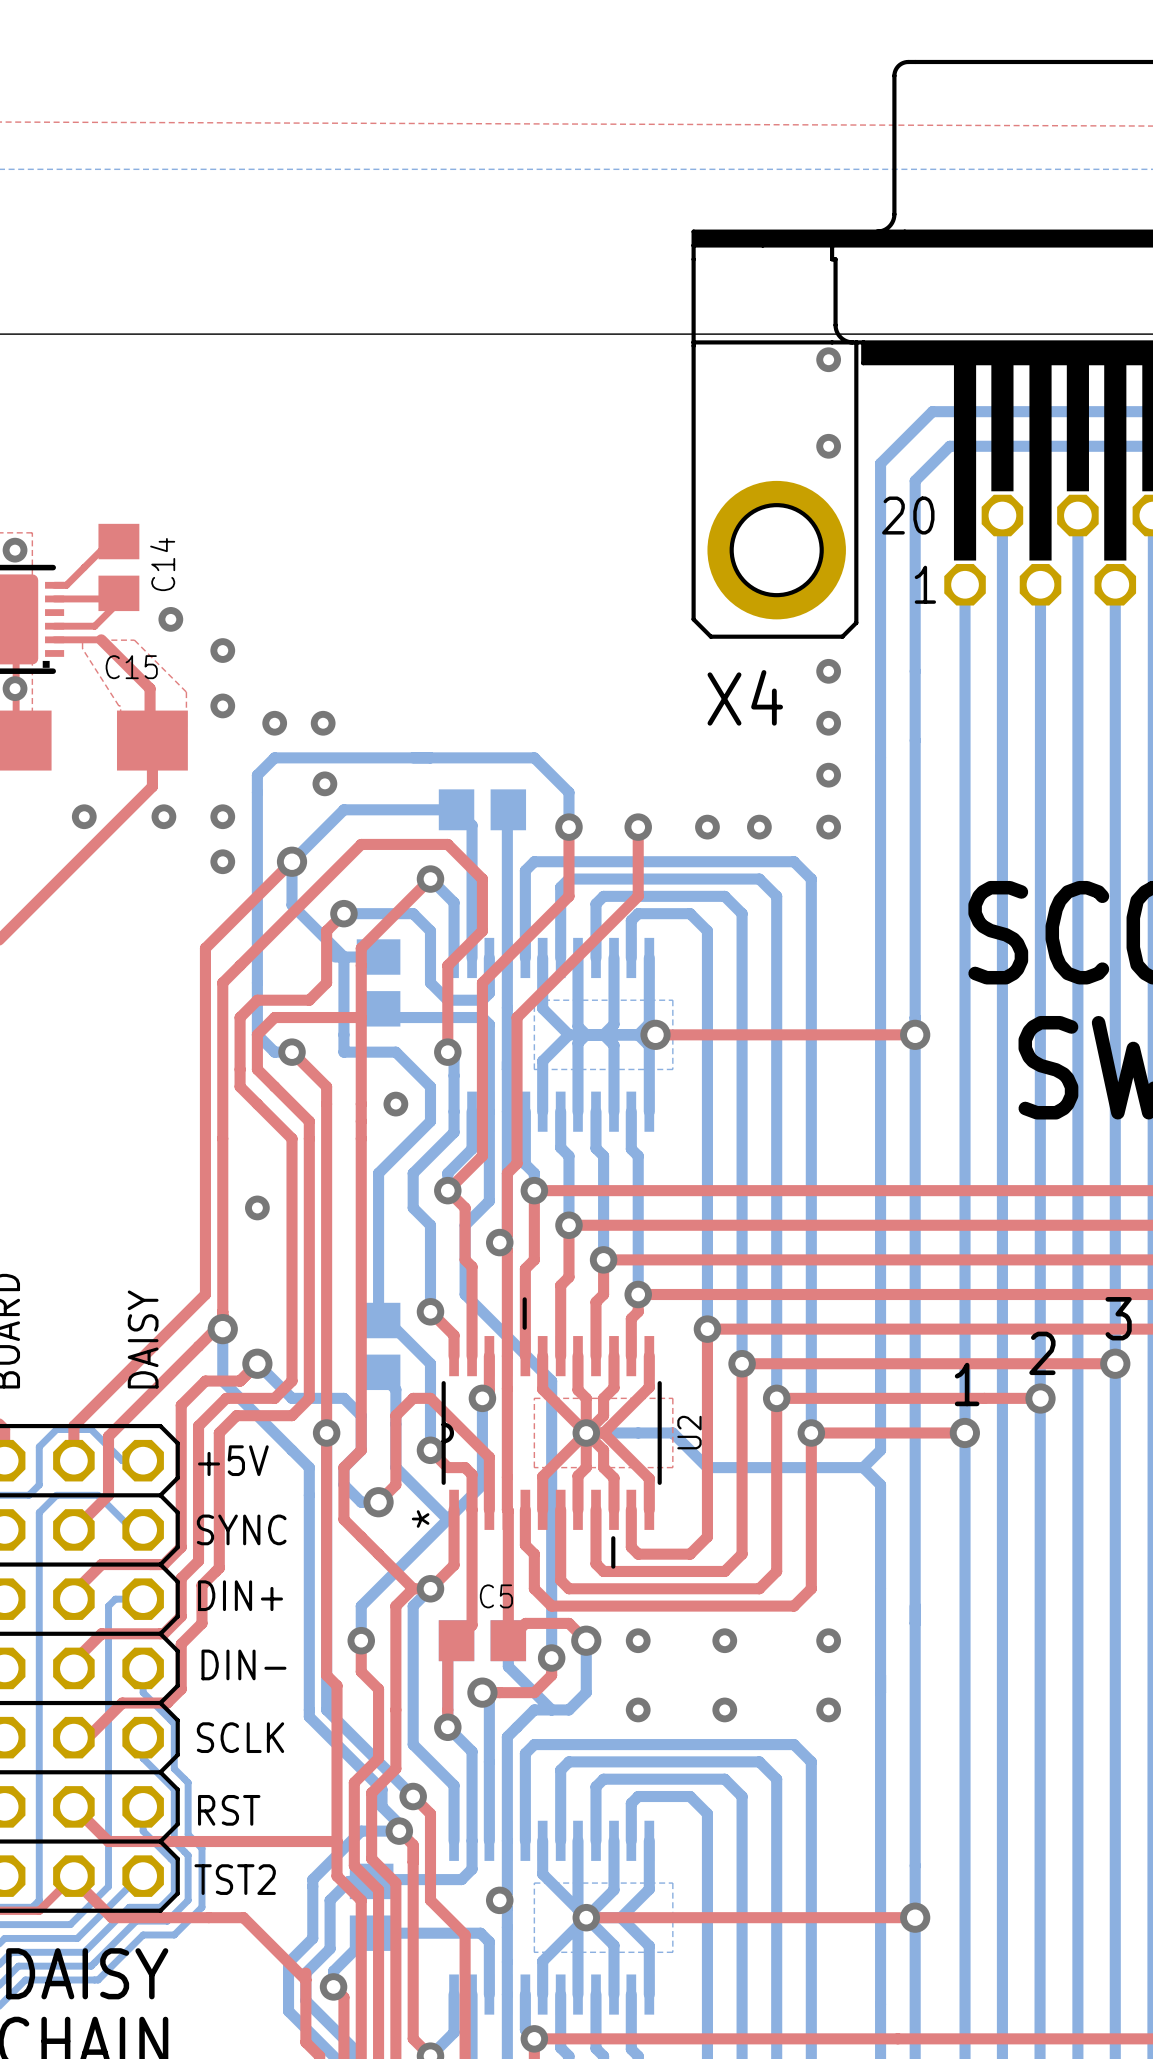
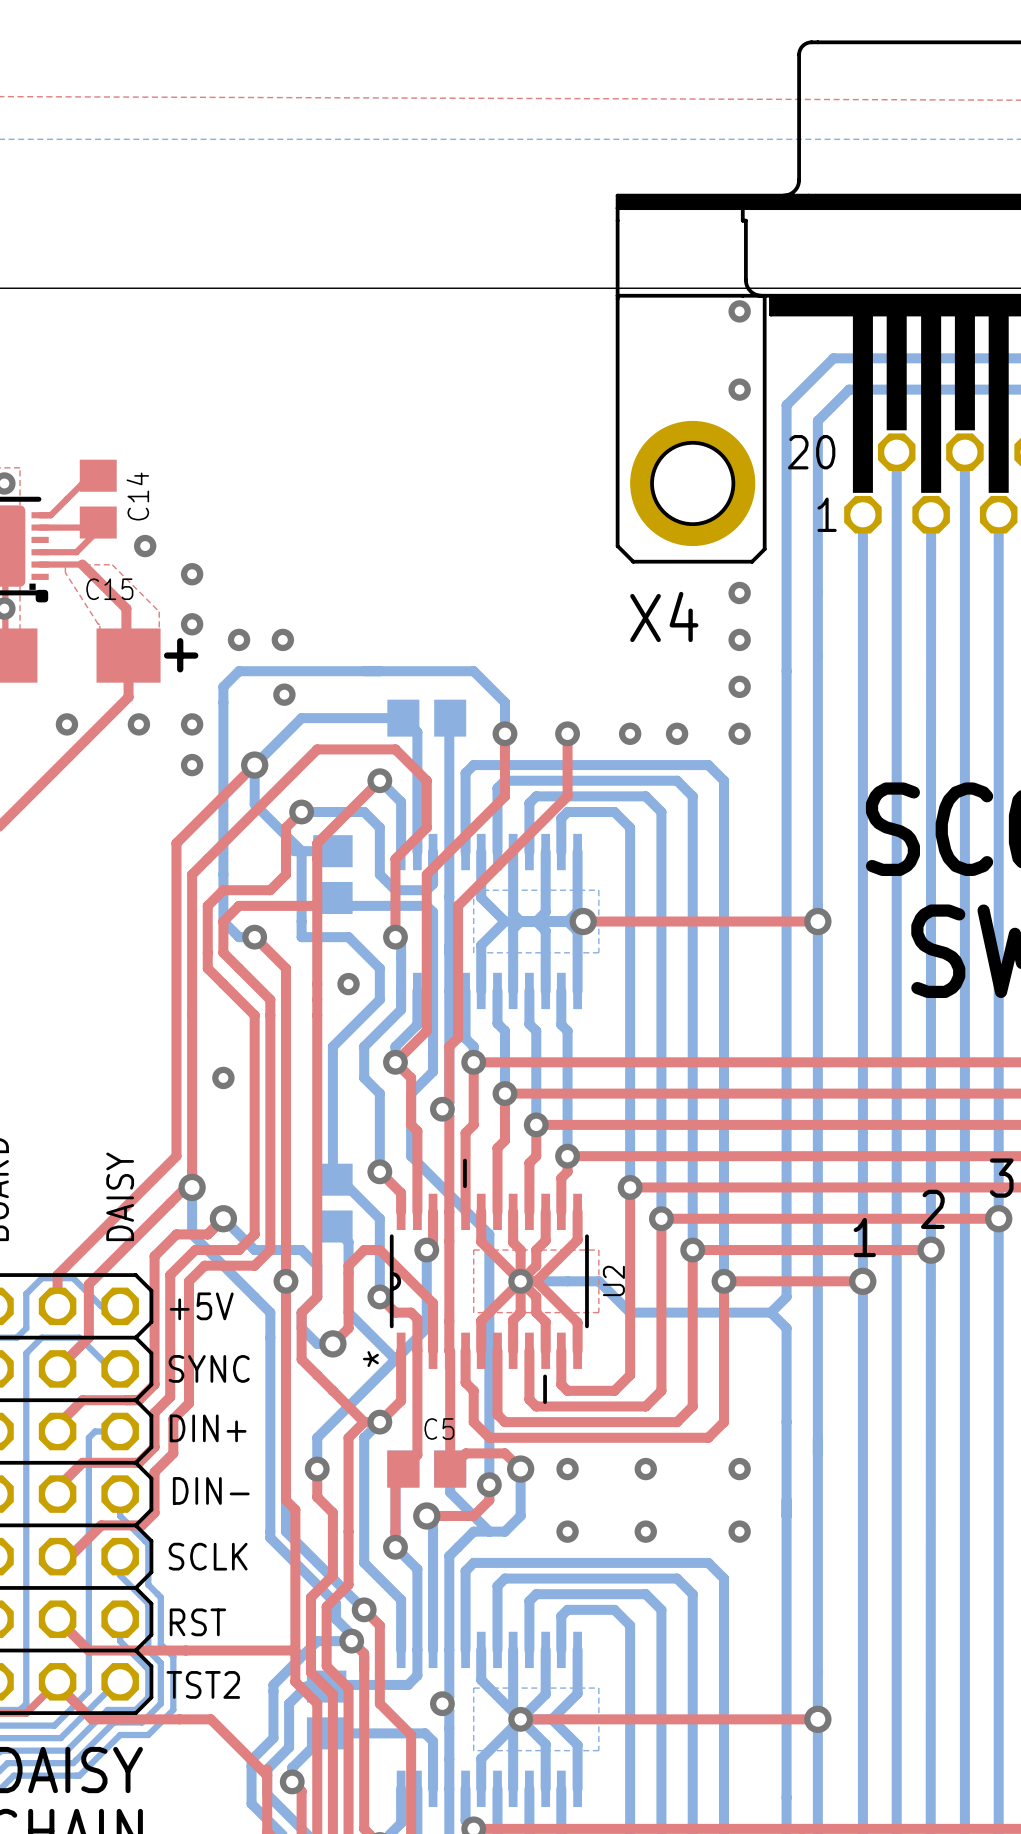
drawing: none -> [35, 589, 49, 603]
line: none -> (180, 641) (180, 669)
line: none -> (167, 655) (195, 655)

